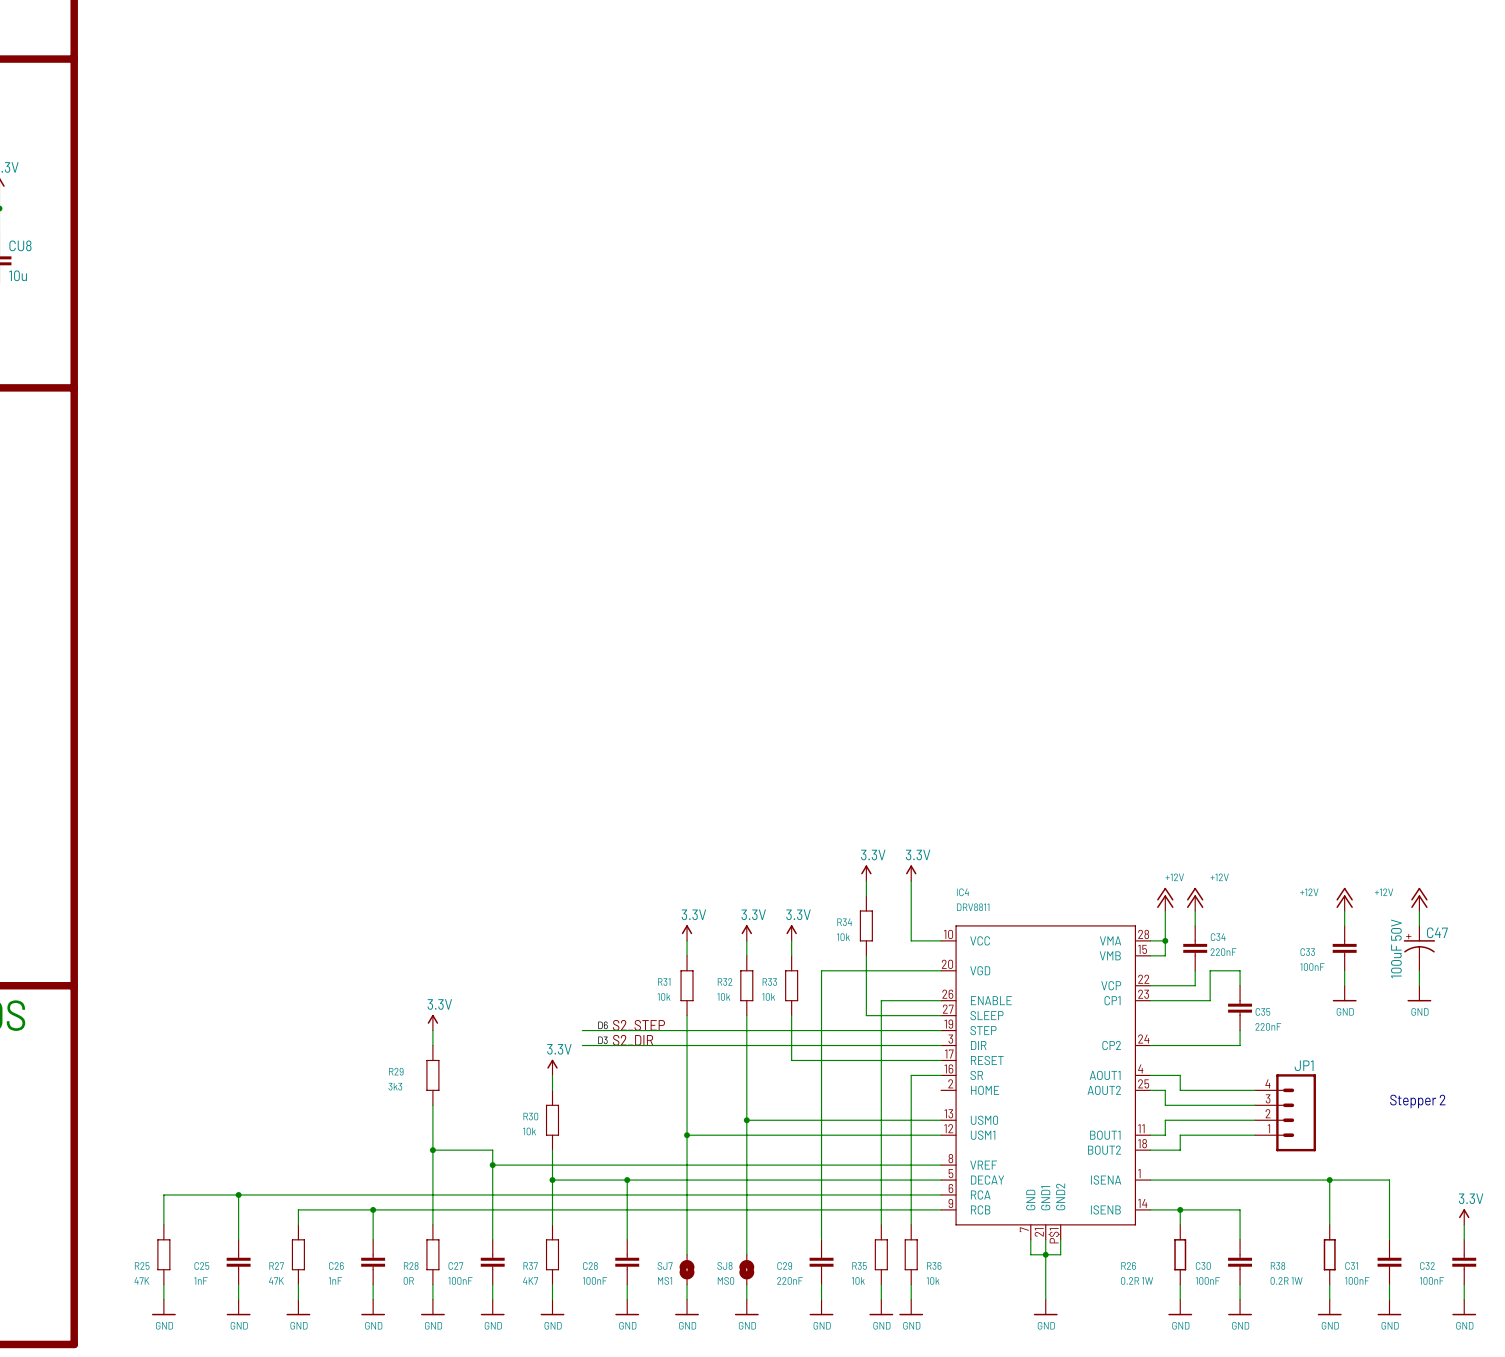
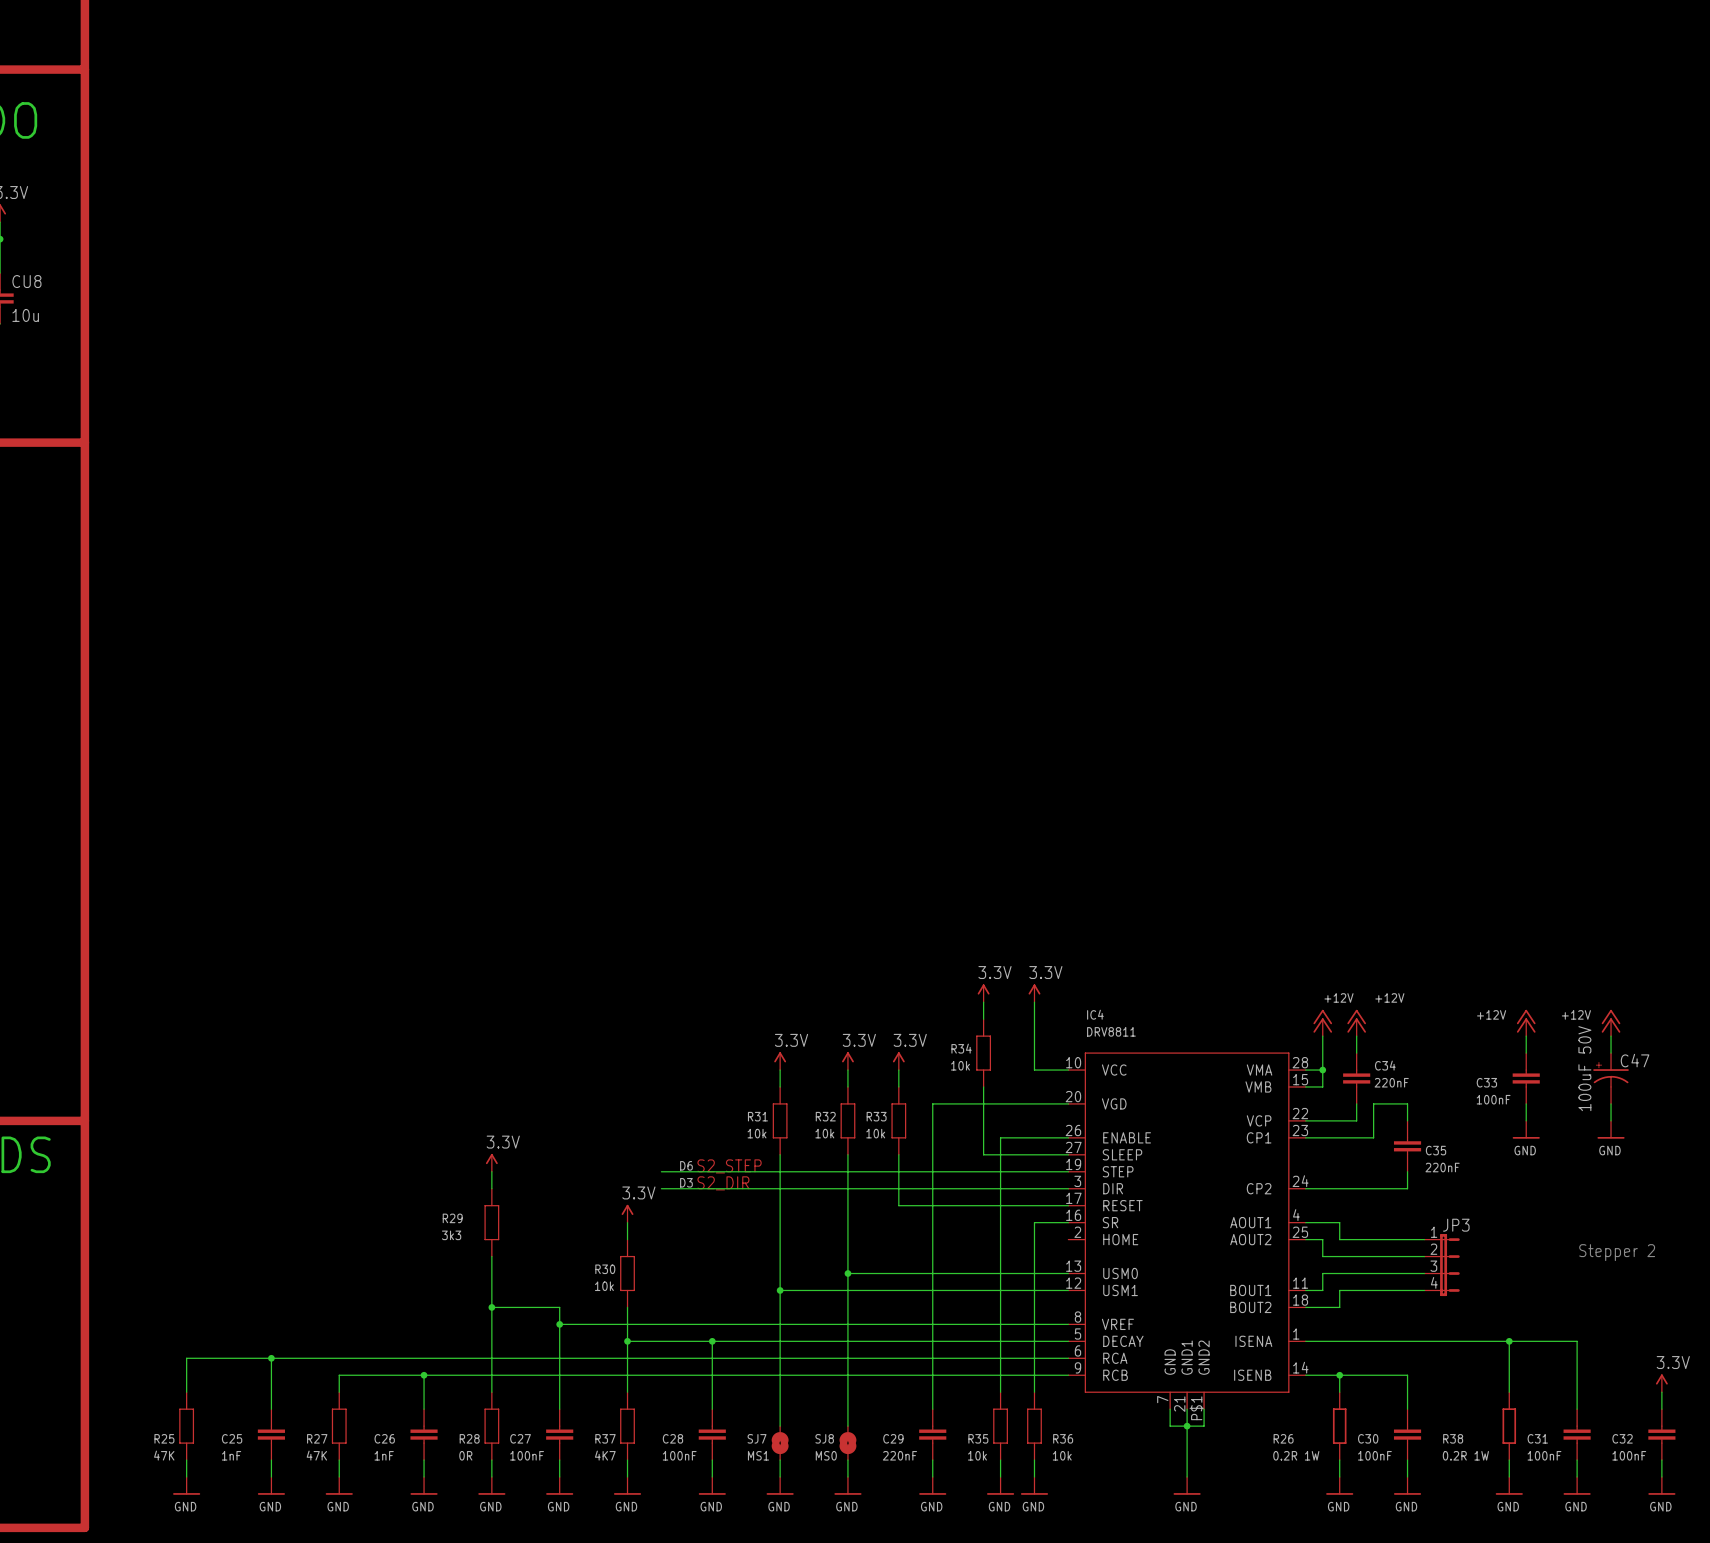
JP3: none -> (1442, 1265)
JP1: (1285, 1112) -> none

